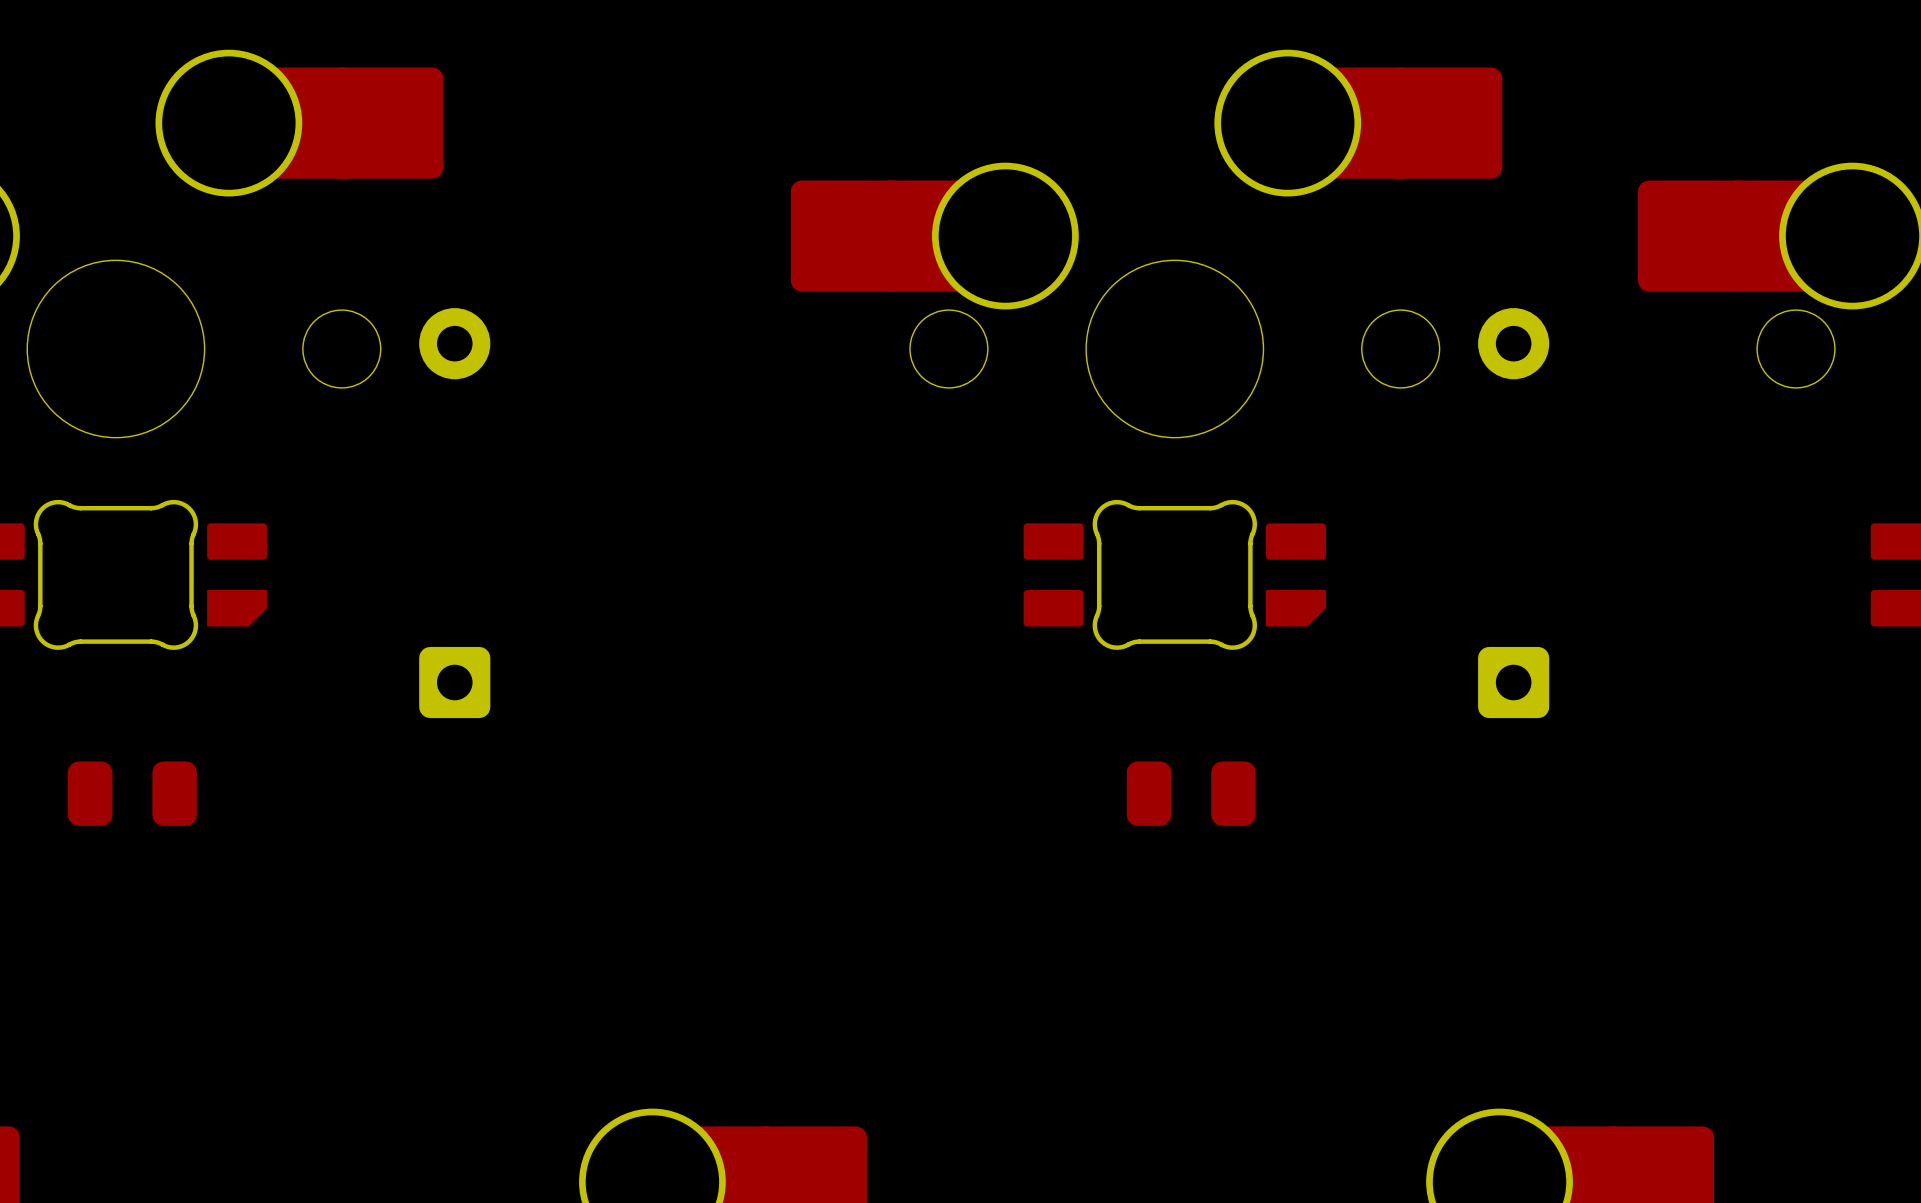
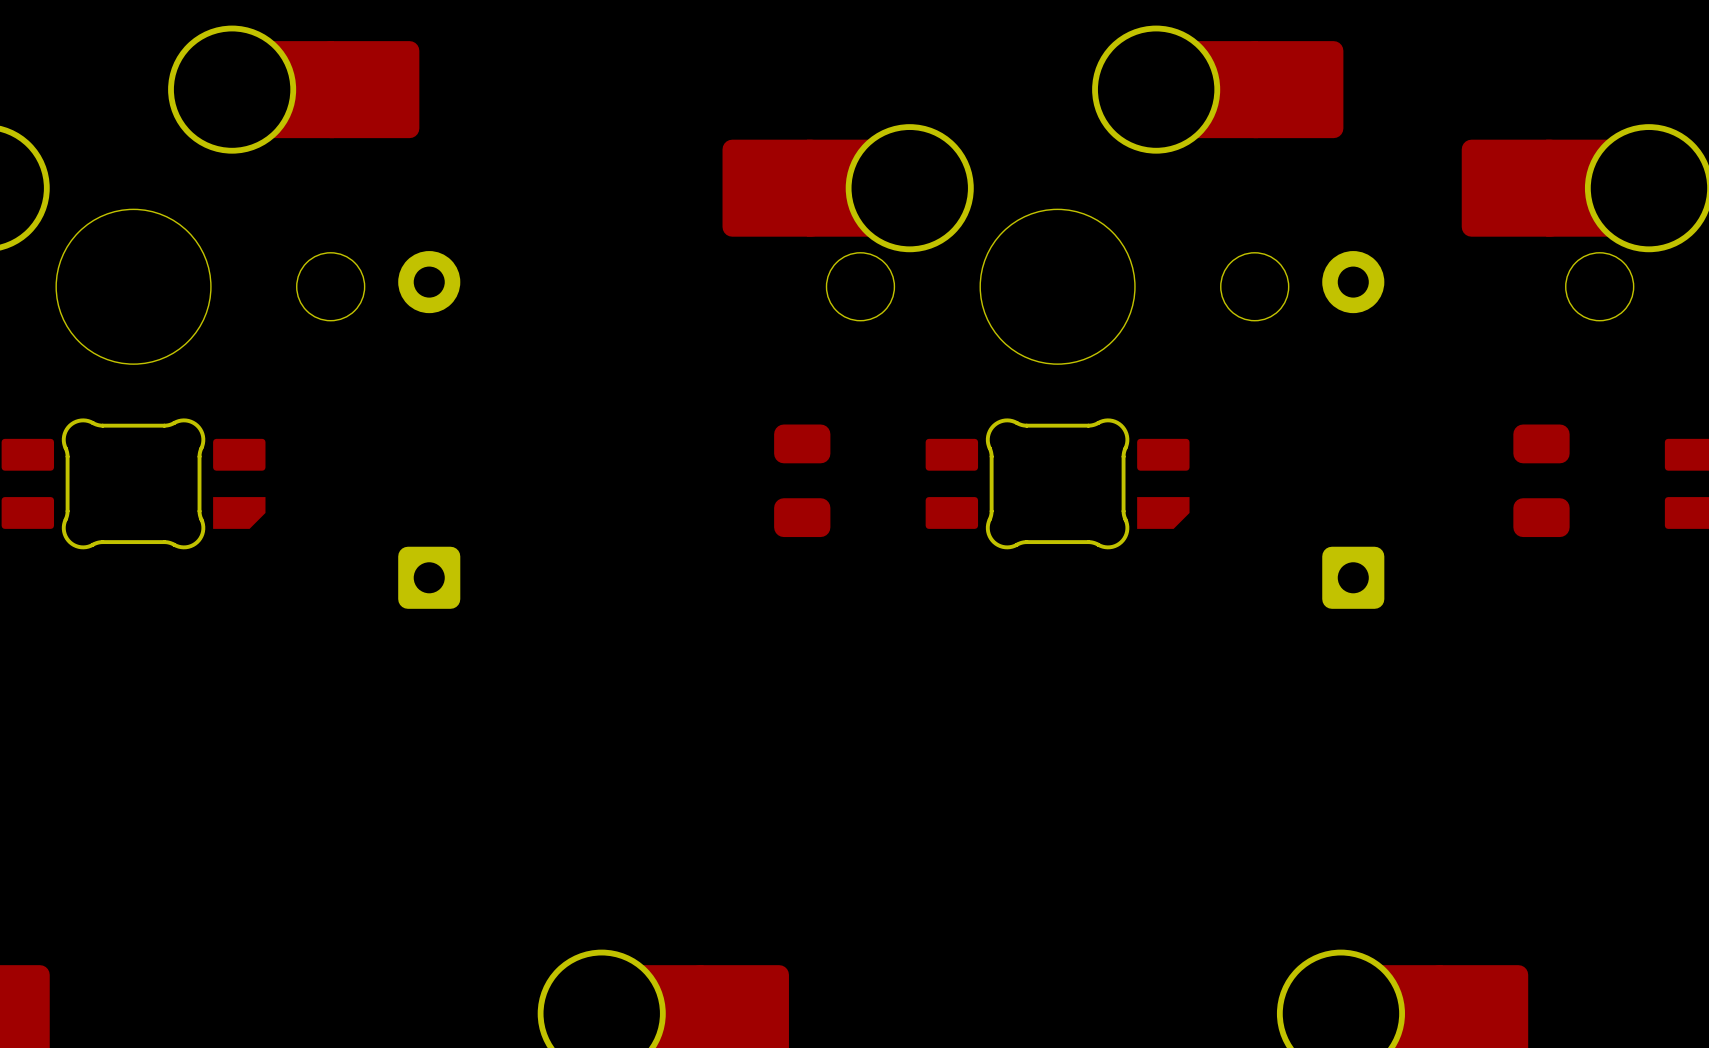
part: none -> (802, 480)
part: none -> (1541, 480)
part: (132, 793) -> none
part: (1191, 793) -> none

